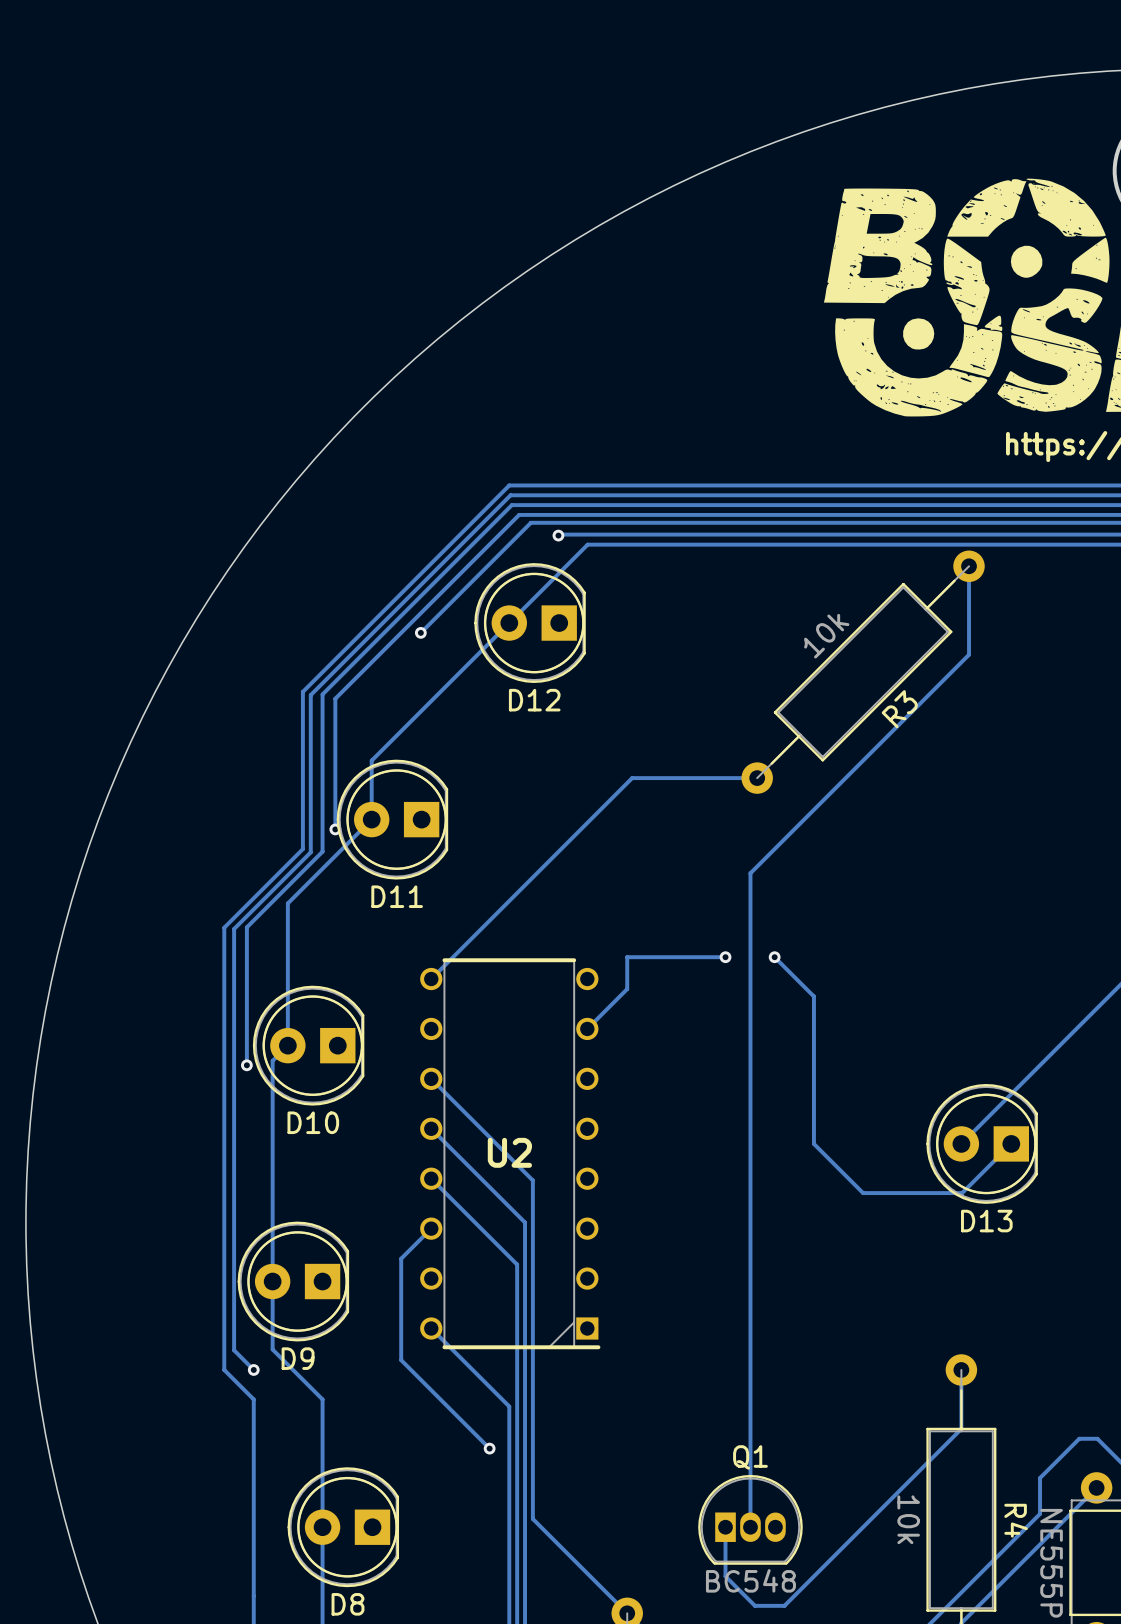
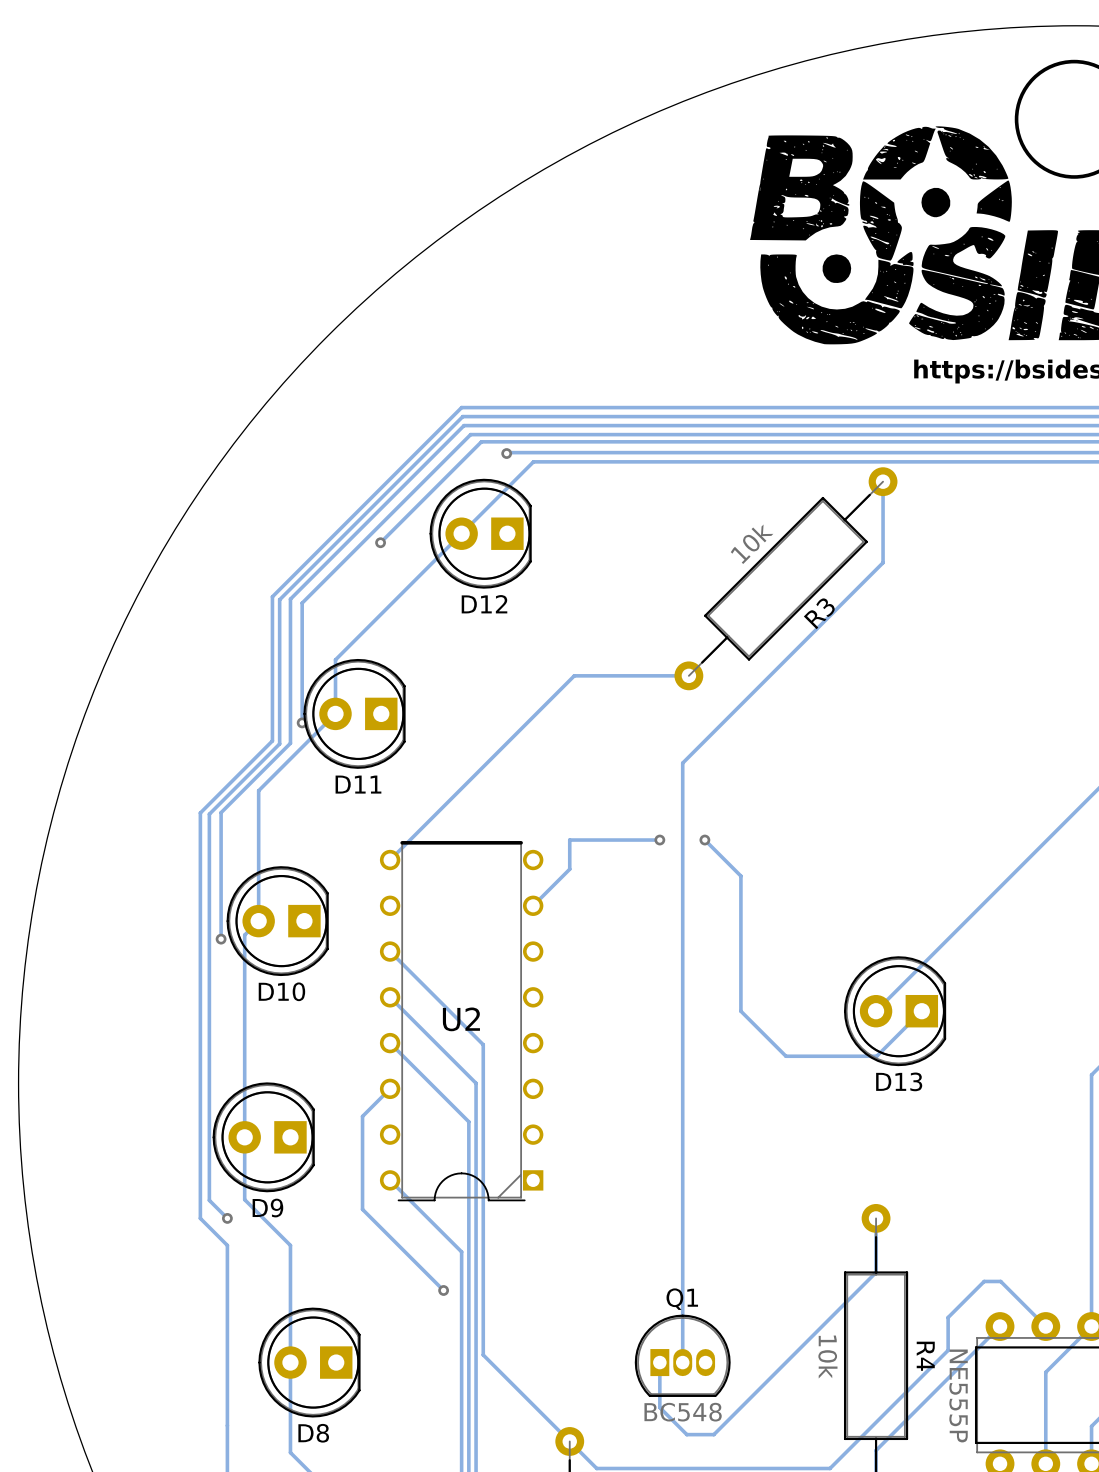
U2 footprint: [420, 958, 601, 1350] -> [379, 841, 544, 1202]

